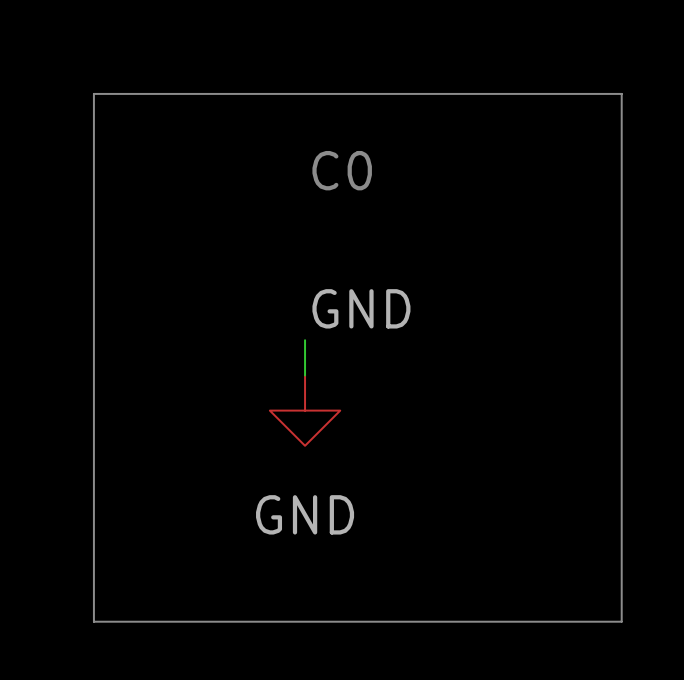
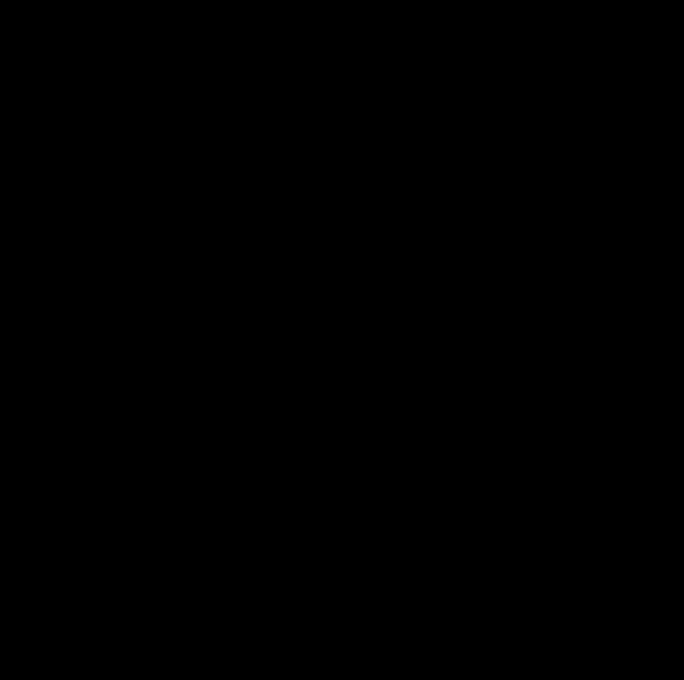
line: (93, 93) (93, 621) (621, 621) (621, 93) (93, 93) -> none
text: C0 (342, 170) -> none
label: GND (361, 308) -> none
wire: (305, 340) (305, 375) -> none
power symbol: GND (305, 410) -> none

